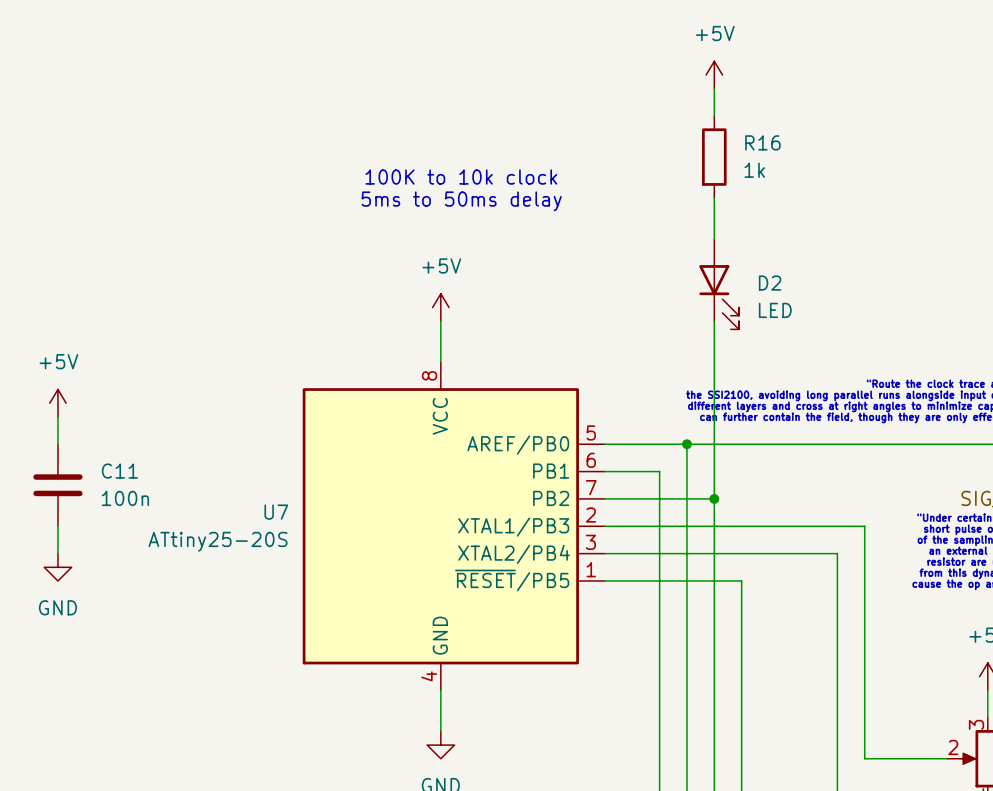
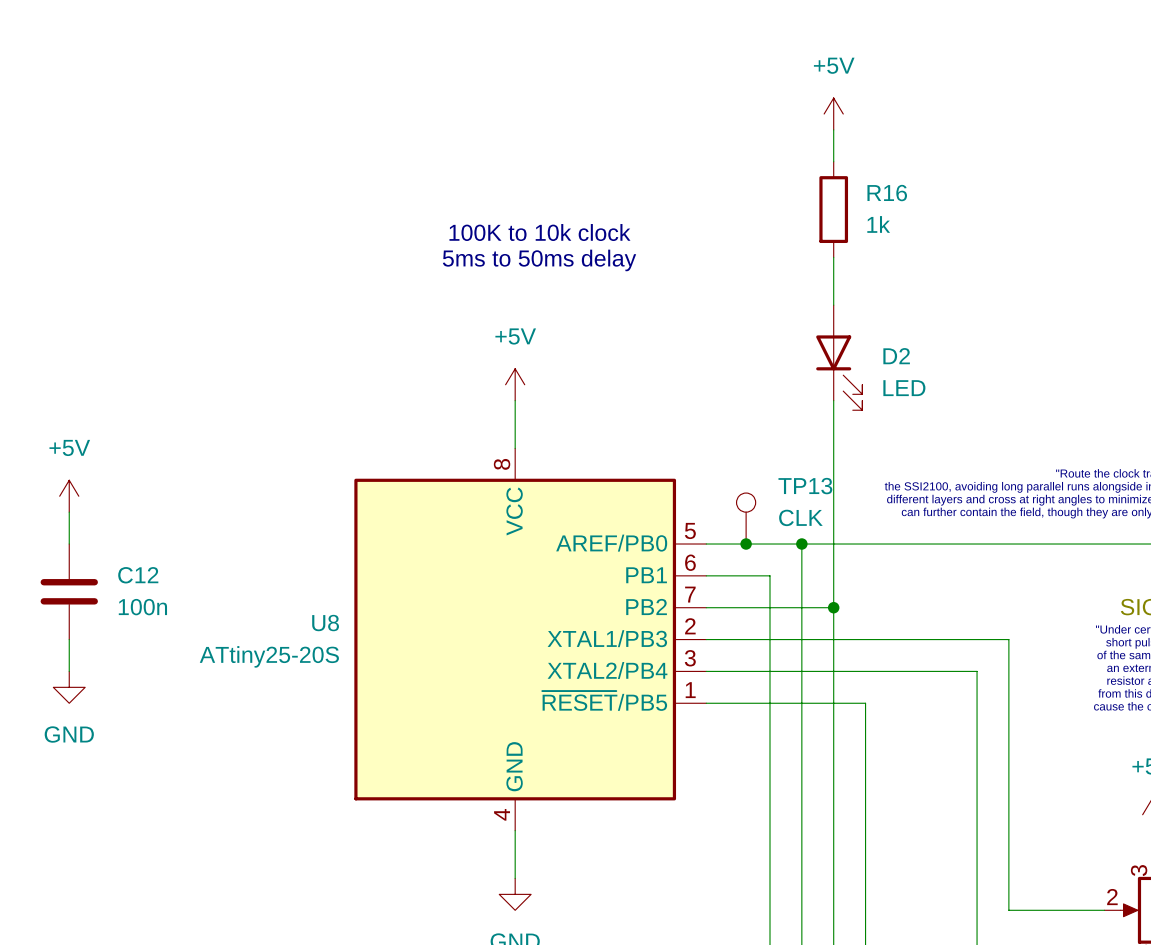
TP13: none -> CLK (746, 518)
junction: none -> (746, 544)
C11 name: C11 (119, 471) -> C12 (138, 575)
U7 name: U7 (276, 512) -> U8 (325, 623)

